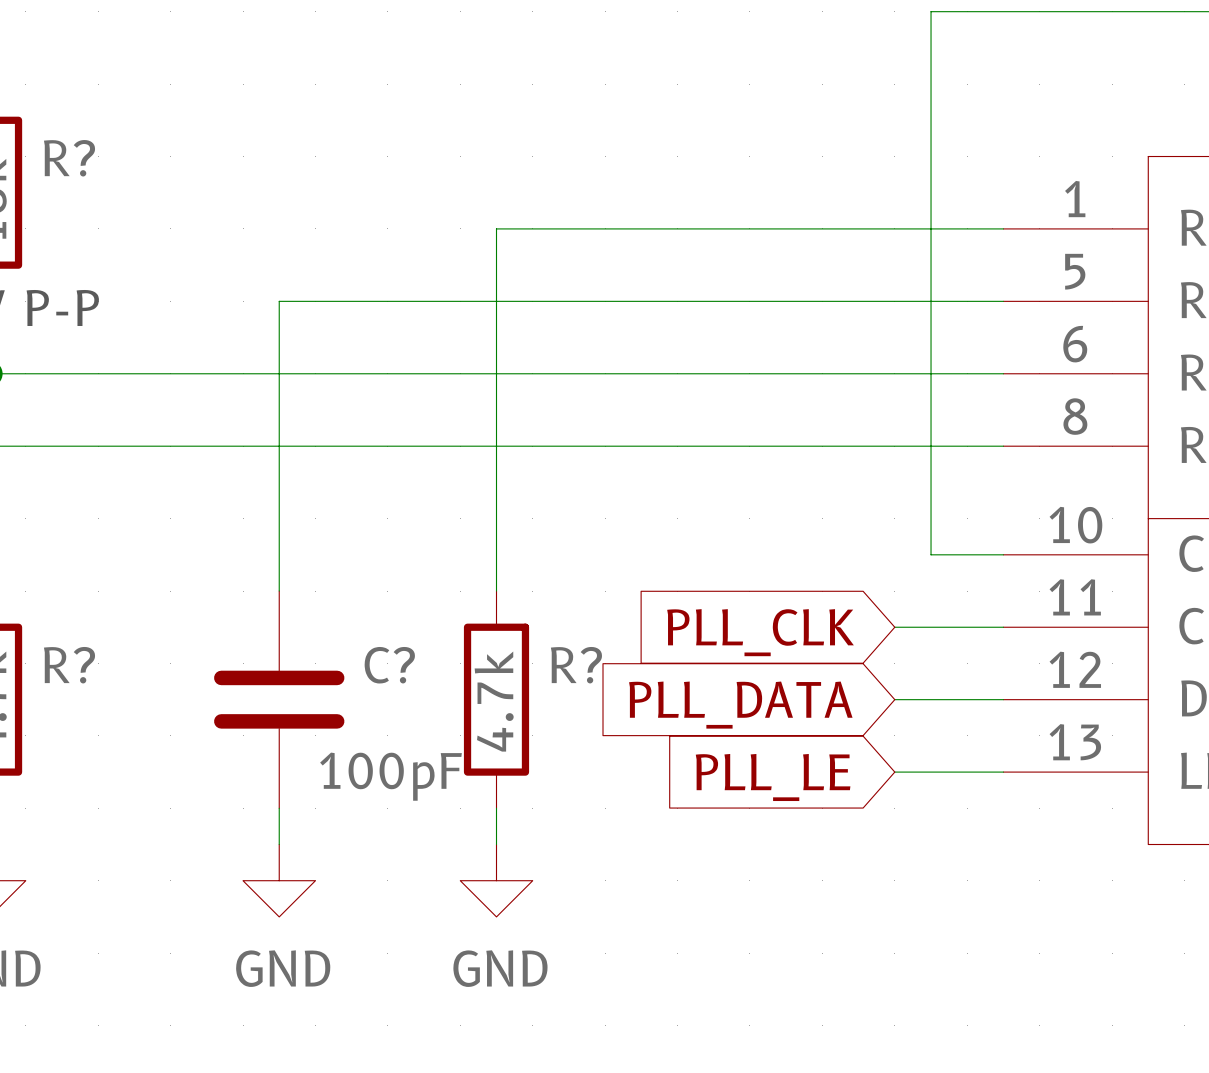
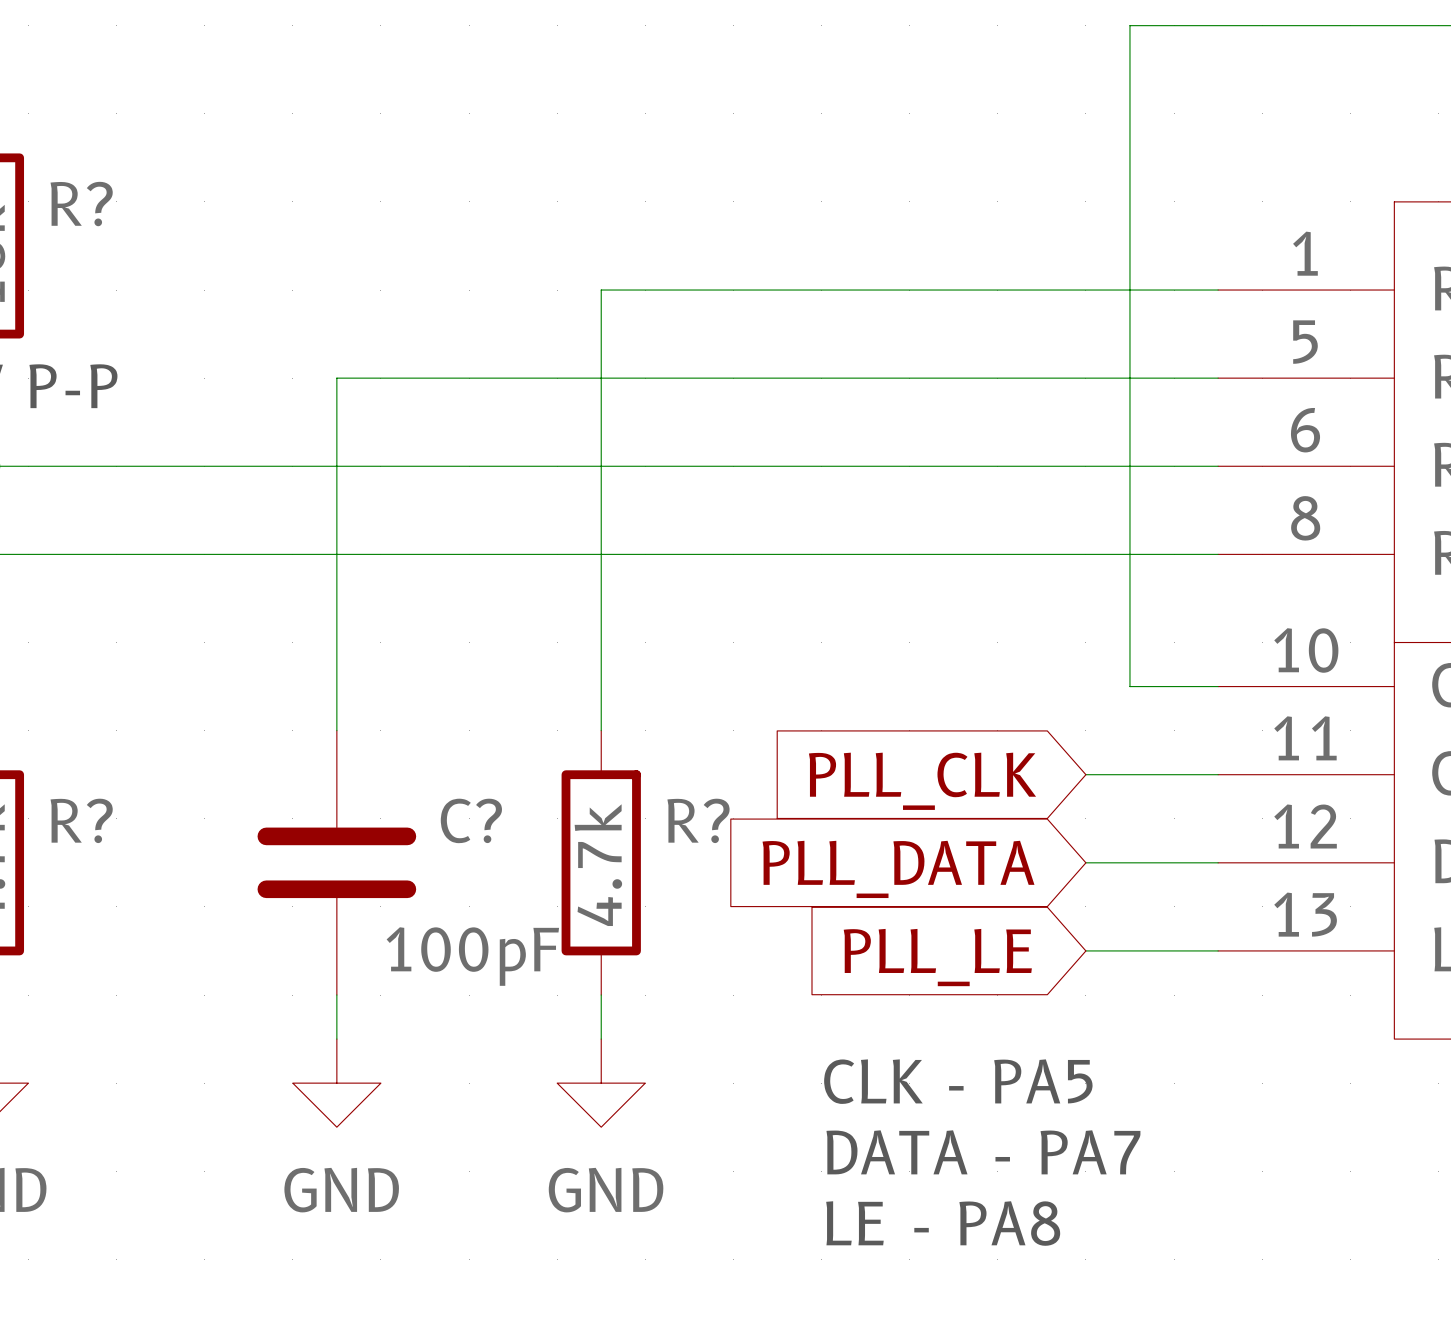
text: none -> CLK - PA5 (958, 1081)
text: none -> DATA - PA7 (983, 1152)
text: none -> LE - PA8 (943, 1223)

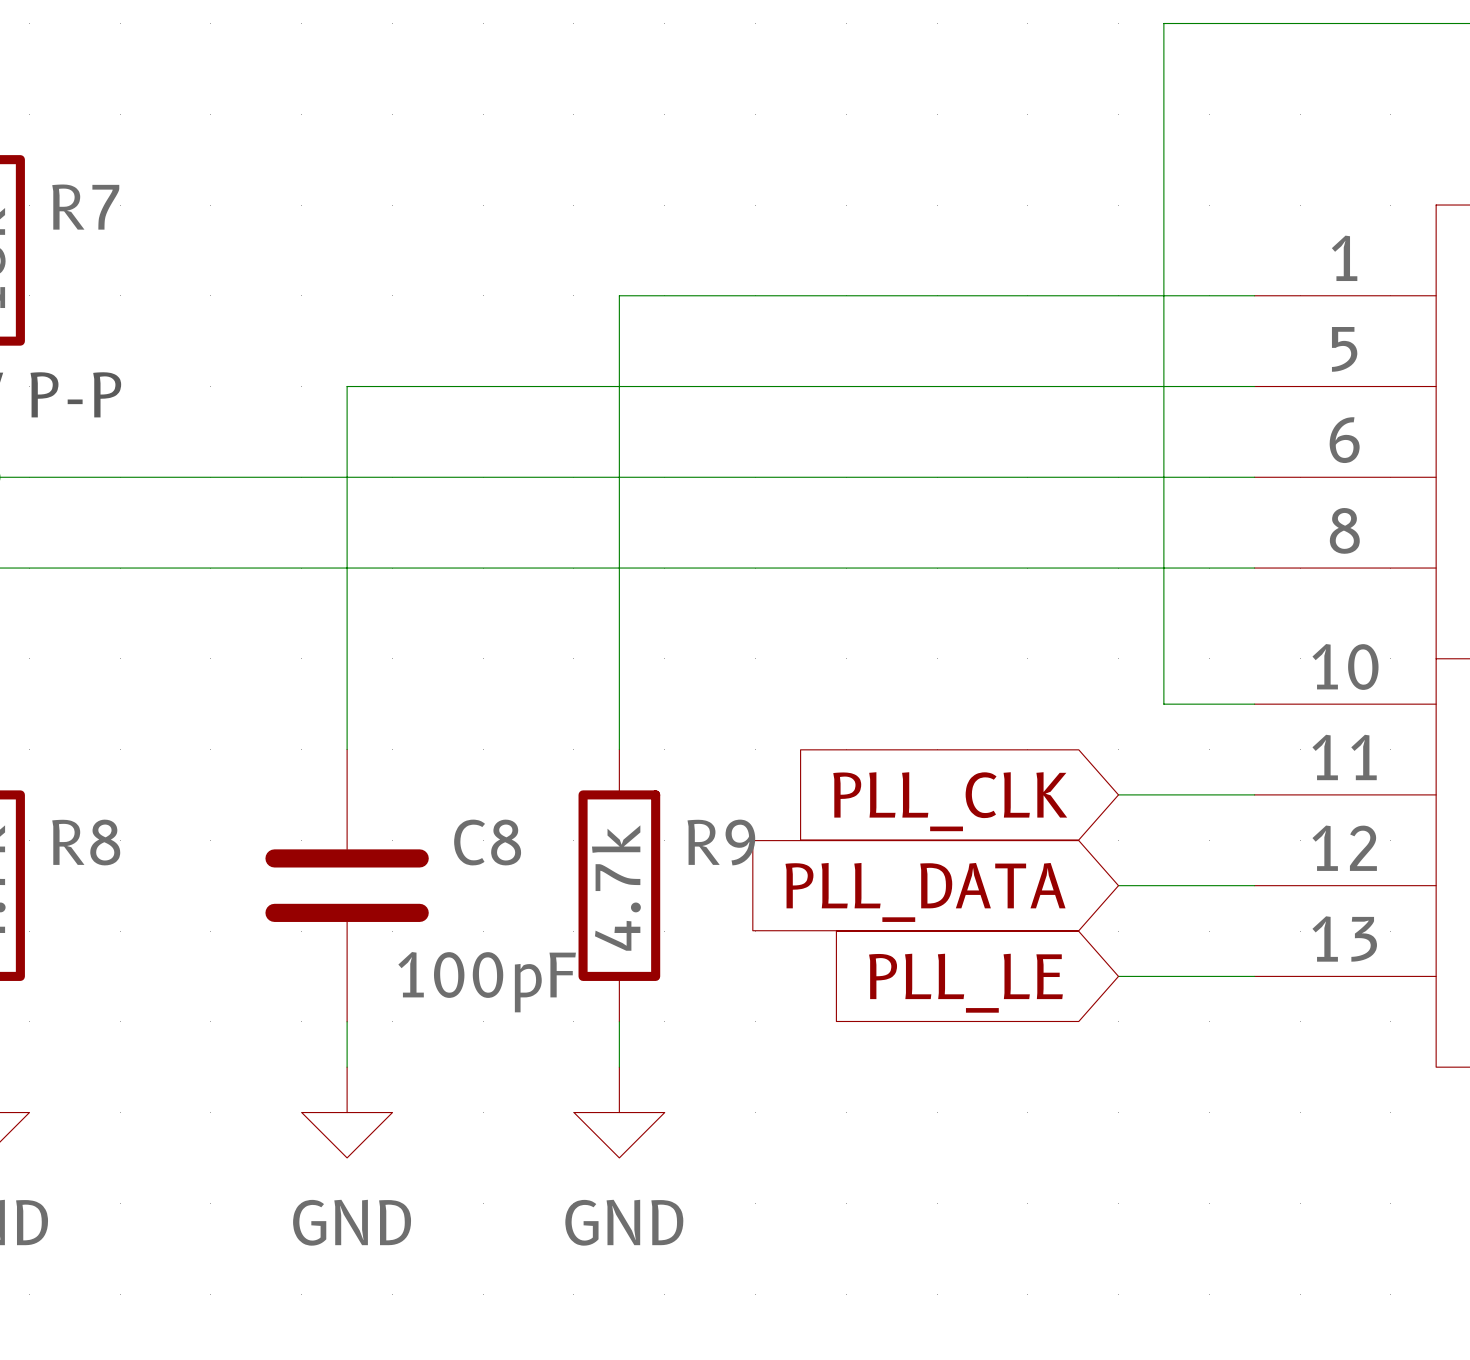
R? name: R? (81, 204) -> R7 (85, 207)
R? name: R? (81, 820) -> R8 (86, 842)
C? name: C? (471, 820) -> C8 (487, 842)
R? name: R? (698, 820) -> R9 (721, 842)
text: CLK - PA5 (958, 1081) -> none
text: DATA - PA7 (983, 1152) -> none
text: LE - PA8 (943, 1223) -> none

